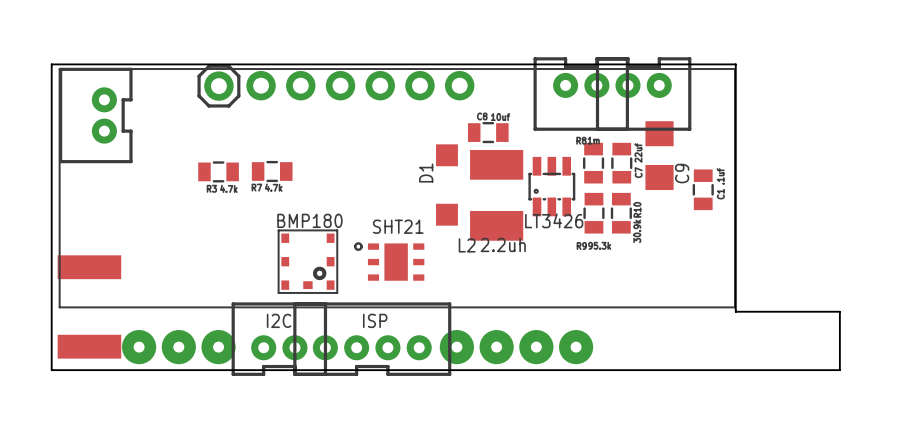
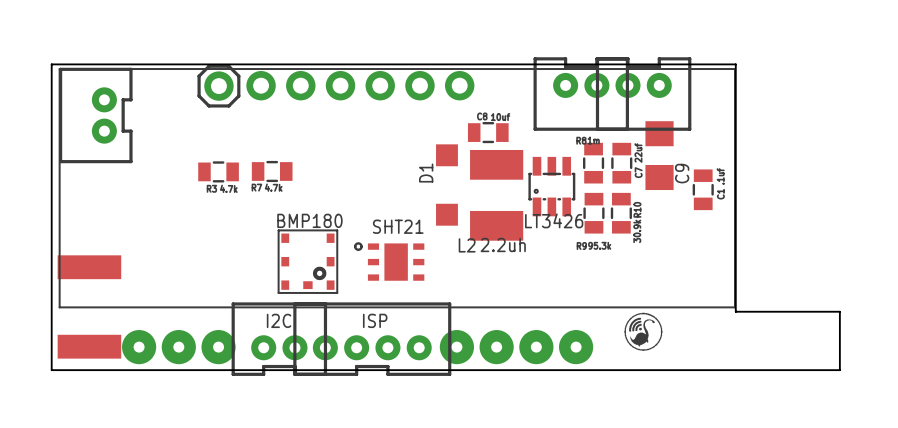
drawing: none -> [624, 312, 663, 351]

